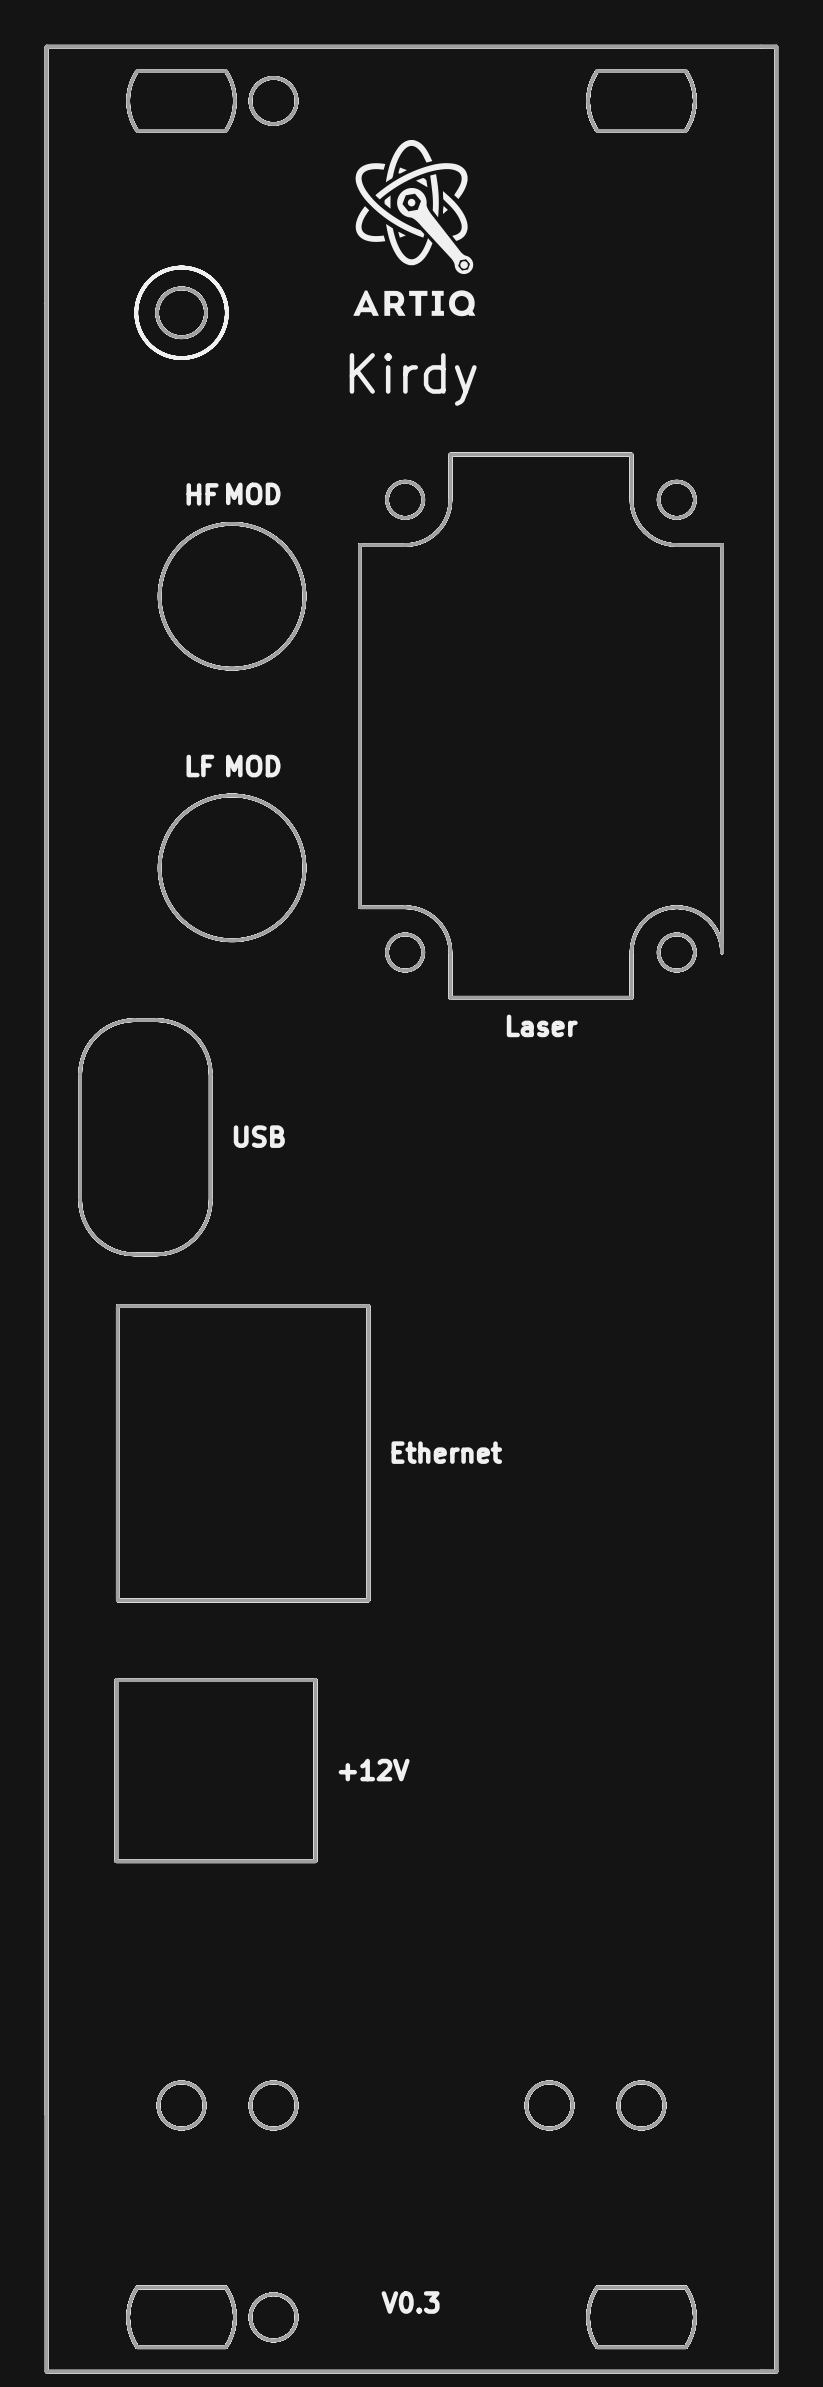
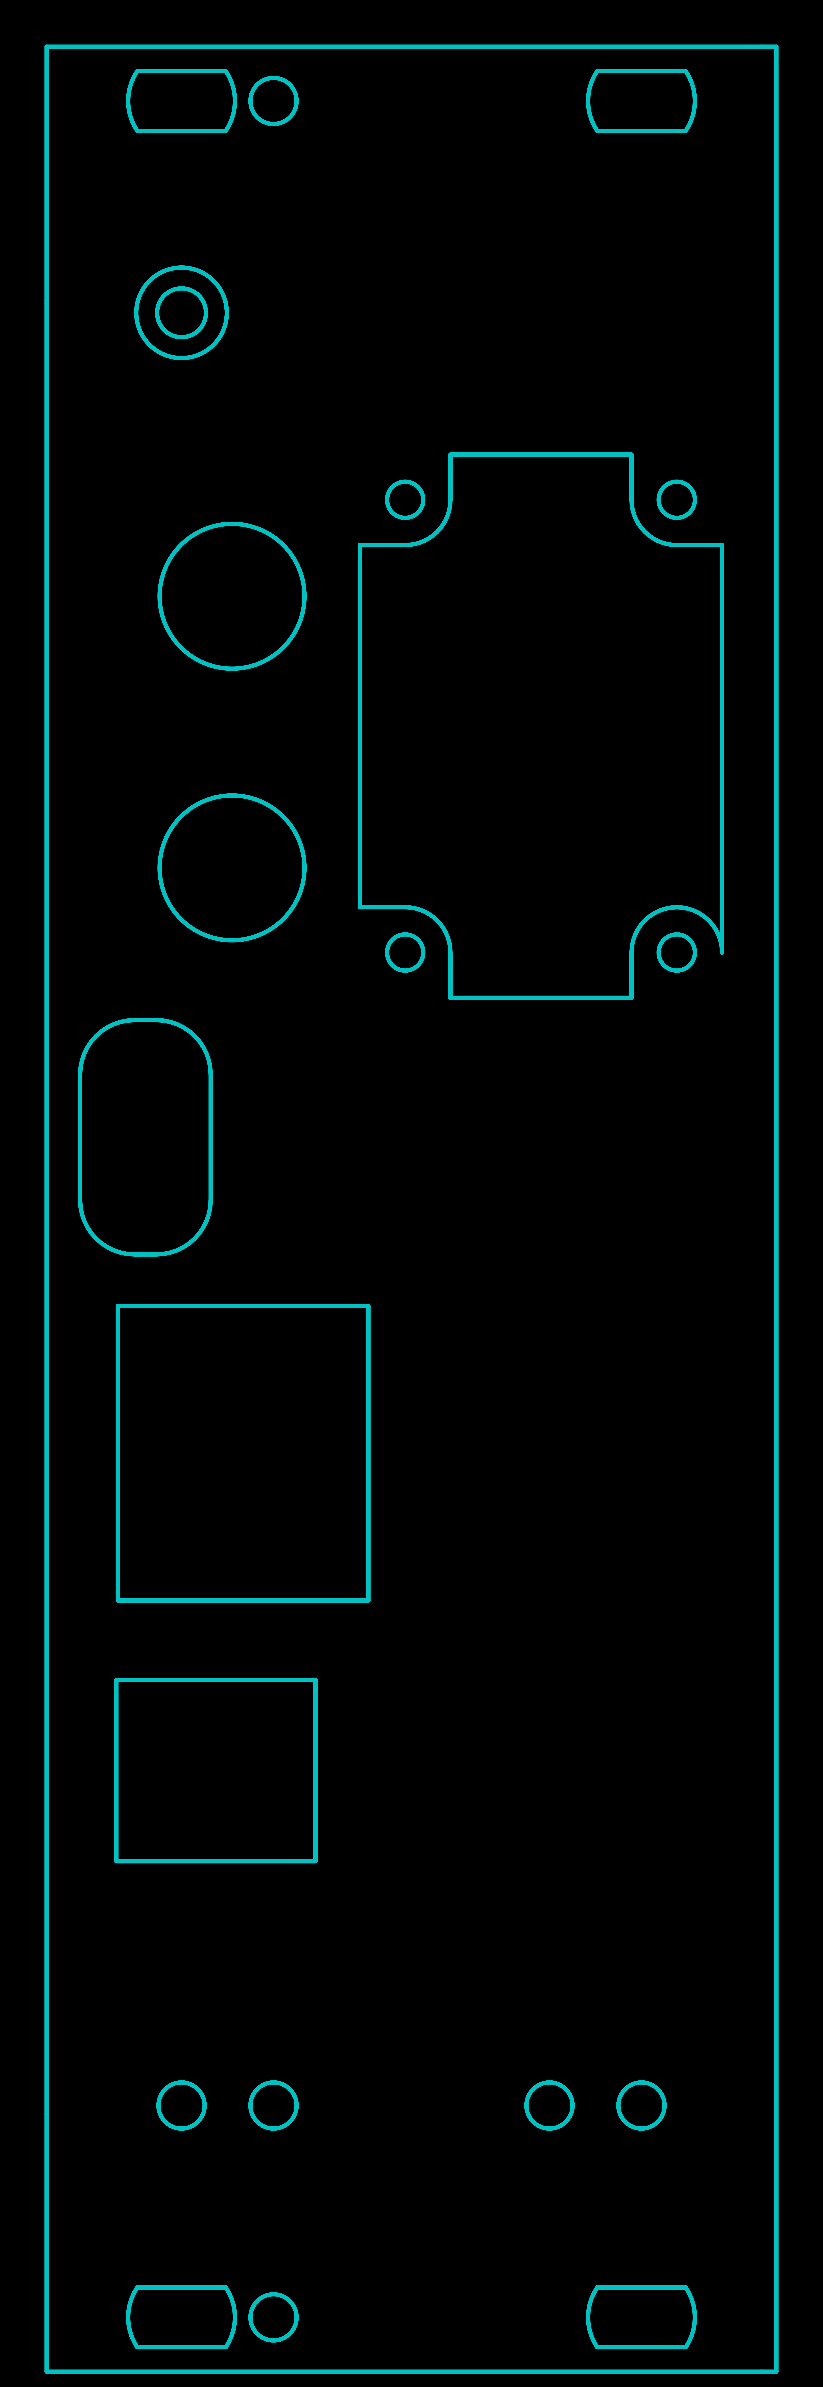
board edge: (46, 46) (46, 2371) (776, 2371) (776, 46) (46, 46) -> none
board edge: (137, 71) (225, 71) (231, 82) (234, 100) (233, 113) (225, 130) (137, 130) (131, 119) (128, 100) (131, 82) (137, 71) -> none
board edge: (597, 71) (685, 71) (691, 82) (694, 100) (691, 119) (685, 130) (597, 130) (591, 119) (588, 100) (589, 88) (597, 71) -> none
round board edge: [248, 76, 299, 126] -> none
drawing: [353, 139, 476, 317] -> none
round board edge: [155, 286, 208, 340] -> none
text: Kirdy (413, 379) -> none
board edge: (450, 454) (450, 505) (446, 517) (437, 531) (427, 538) (411, 544) (359, 545) (359, 907) (415, 908) (429, 914) (437, 920) (443, 928) (449, 942) (450, 997) (631, 997) (633, 940) (640, 924) (654, 913) (665, 908) (676, 907) (688, 908) (699, 913) (708, 920) (715, 929) (720, 940) (722, 952) (722, 545) (670, 544) (659, 541) (644, 531) (634, 517) (631, 505) (631, 454) (450, 454) -> none
round board edge: [385, 479, 426, 520] -> none
round board edge: [656, 479, 697, 520] -> none
text: MOD (253, 493) -> none
text: HF (202, 494) -> none
round board edge: [157, 522, 307, 671] -> none
text: LF (200, 765) -> none
text: MOD (253, 766) -> none
round board edge: [157, 793, 307, 943] -> none
round board edge: [385, 932, 426, 973] -> none
round board edge: [656, 932, 697, 973] -> none
board edge: (134, 1020) (162, 1020) (185, 1028) (202, 1045) (210, 1068) (210, 1200) (208, 1214) (203, 1227) (194, 1238) (183, 1247) (163, 1253) (127, 1253) (107, 1247) (91, 1233) (84, 1220) (80, 1207) (81, 1062) (88, 1045) (100, 1031) (116, 1023) (134, 1020) -> none
text: Laser (542, 1025) -> none
text: USB (259, 1136) -> none
board edge: (117, 1306) (368, 1306) (368, 1600) (117, 1600) (117, 1306) -> none
text: Ethernet (446, 1452) -> none
board edge: (116, 1680) (116, 1861) (315, 1861) (315, 1680) (116, 1680) -> none
text: +12V (374, 1770) -> none
round board edge: [156, 2080, 207, 2131] -> none
round board edge: [248, 2080, 299, 2131] -> none
round board edge: [524, 2080, 575, 2131] -> none
round board edge: [616, 2080, 667, 2131] -> none
board edge: (137, 2287) (225, 2287) (231, 2298) (234, 2317) (233, 2329) (225, 2347) (137, 2347) (131, 2335) (128, 2317) (129, 2304) (137, 2287) -> none
board edge: (597, 2287) (685, 2287) (691, 2298) (694, 2317) (693, 2329) (685, 2347) (597, 2347) (591, 2335) (588, 2317) (591, 2298) (597, 2287) -> none
round board edge: [248, 2292, 299, 2343] -> none
text: V0.3 (410, 2302) -> none

